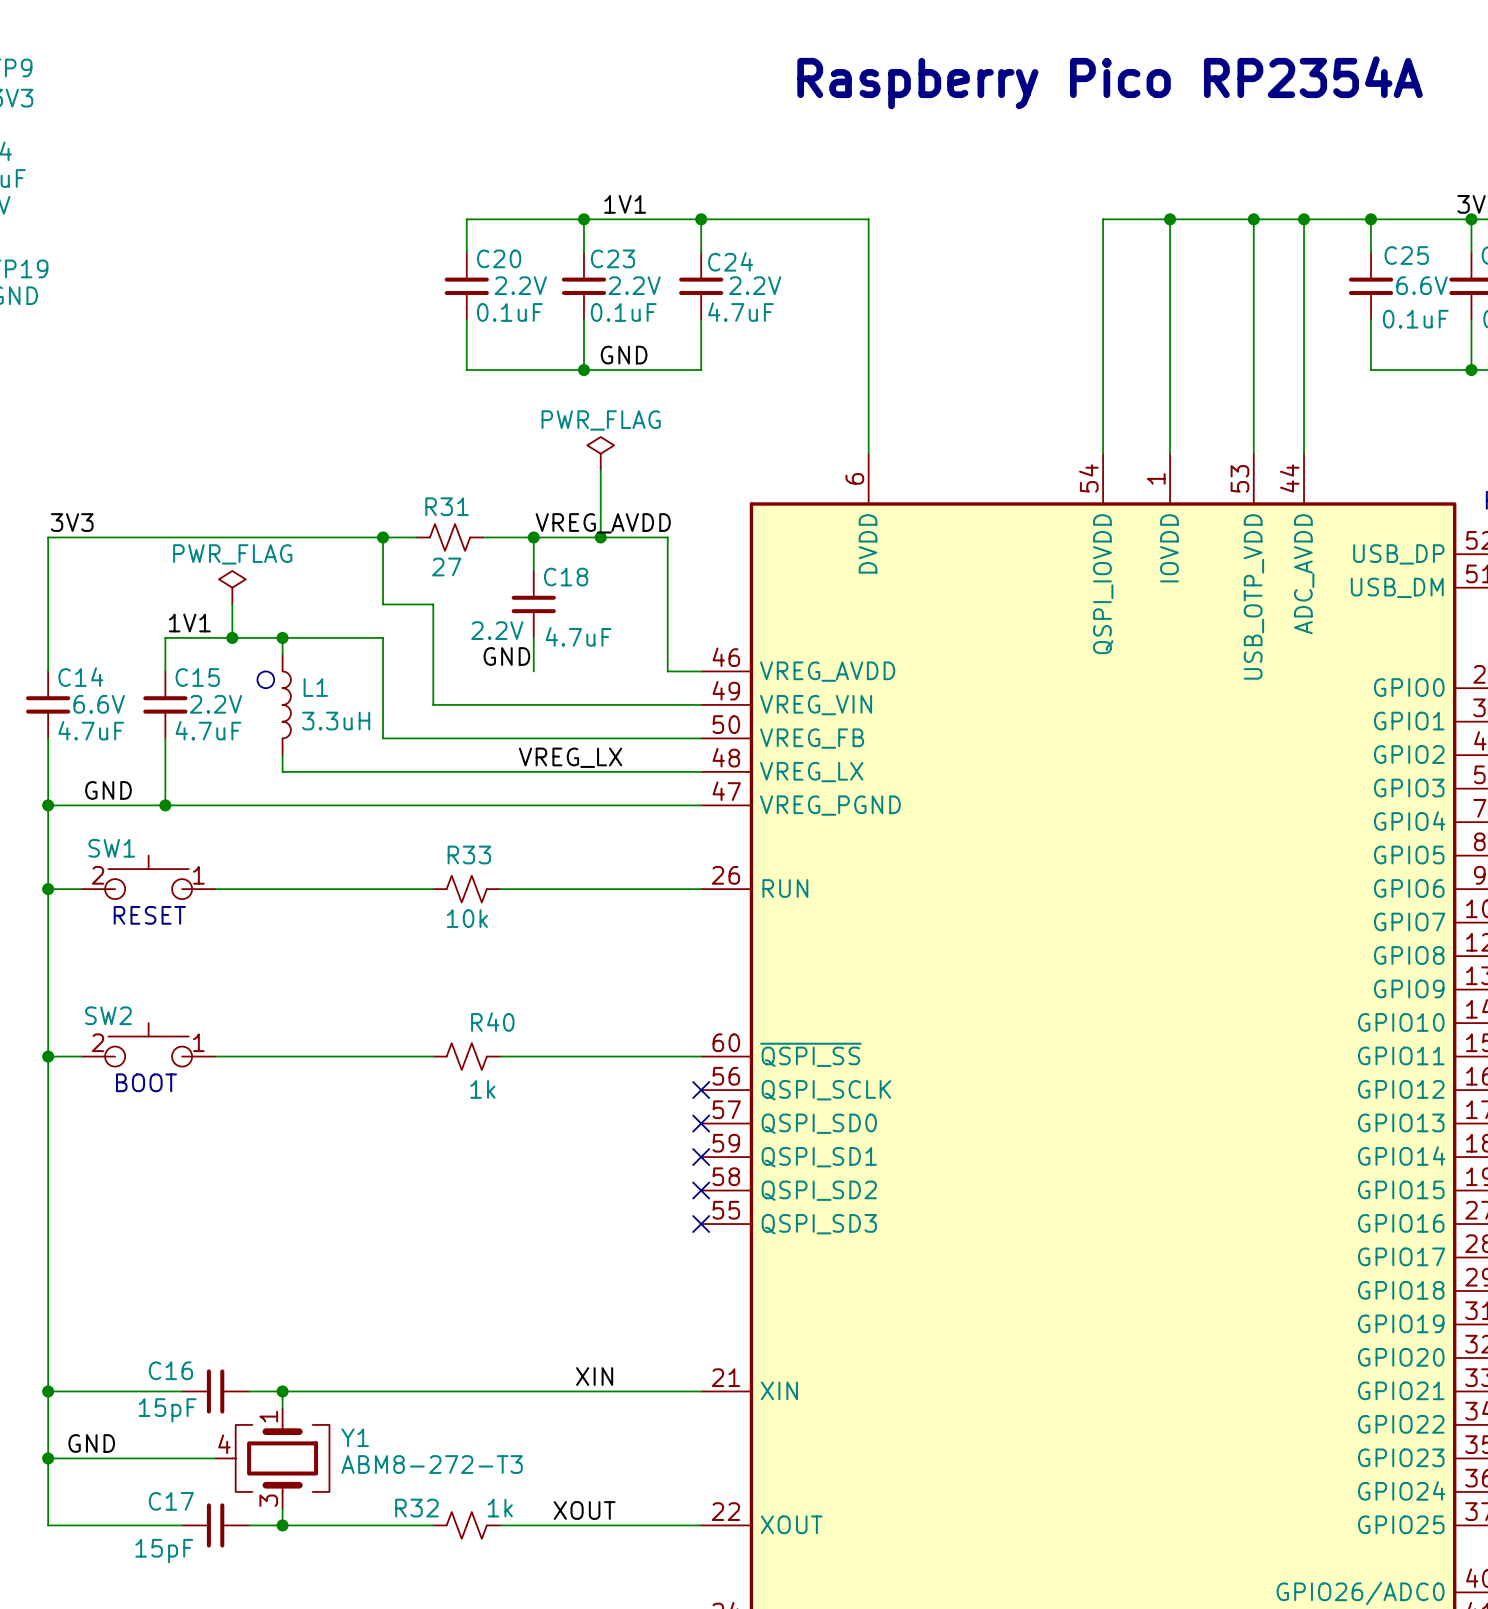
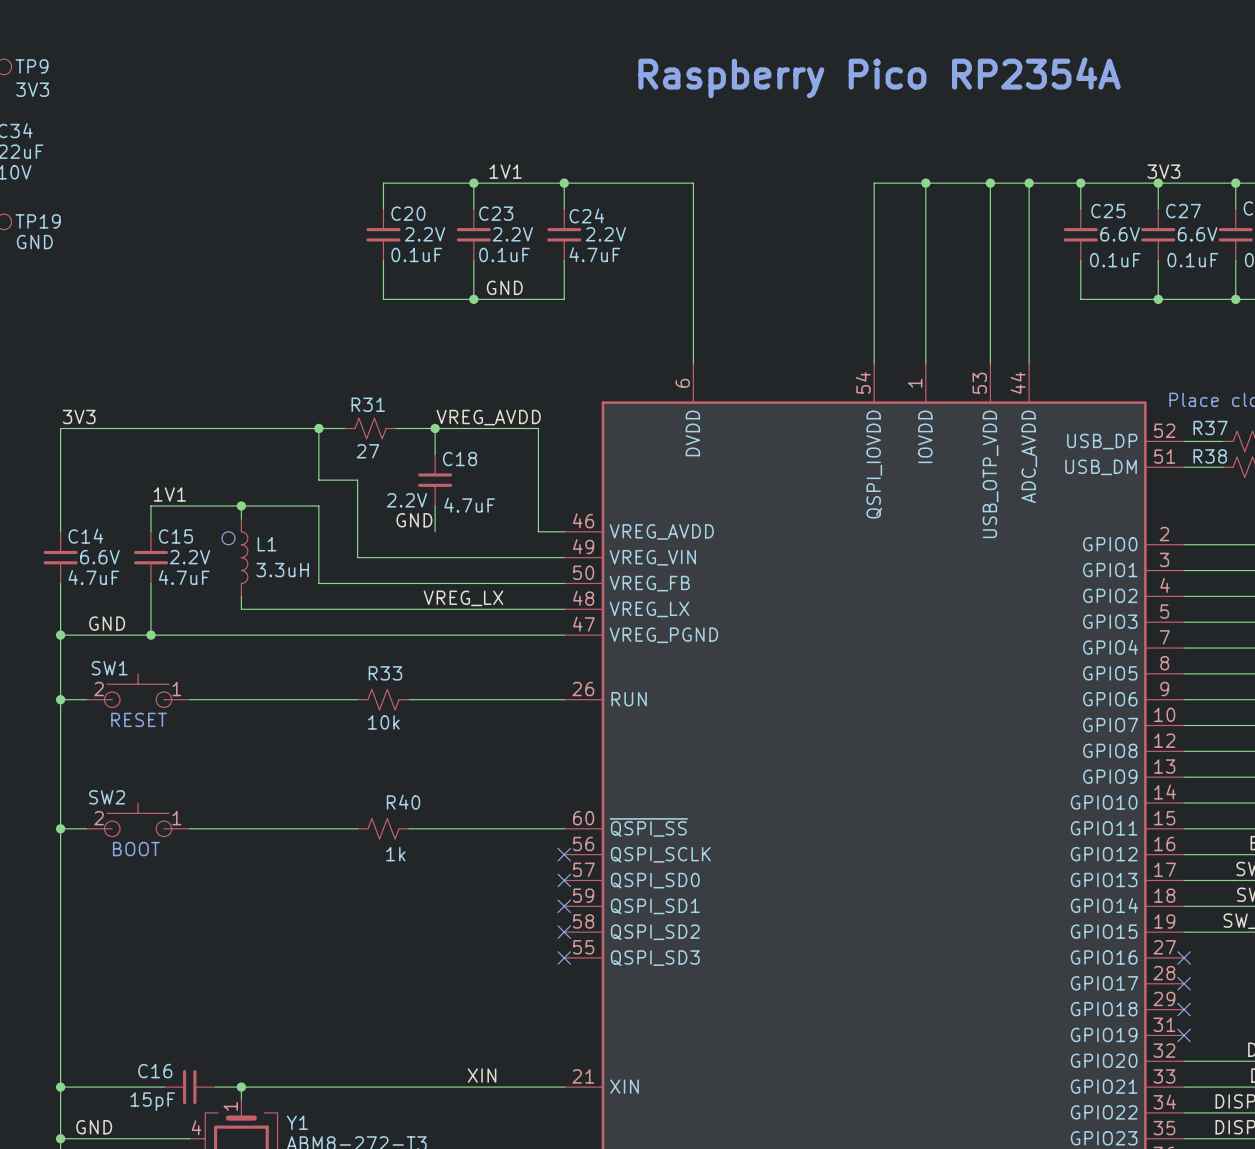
power symbol: PWR_FLAG (600, 453) -> none
wire: (600, 470) (600, 537) -> none
junction: (600, 537) -> none
power symbol: PWR_FLAG (232, 587) -> none
wire: (232, 604) (232, 637) -> none
junction: (232, 637) -> none

